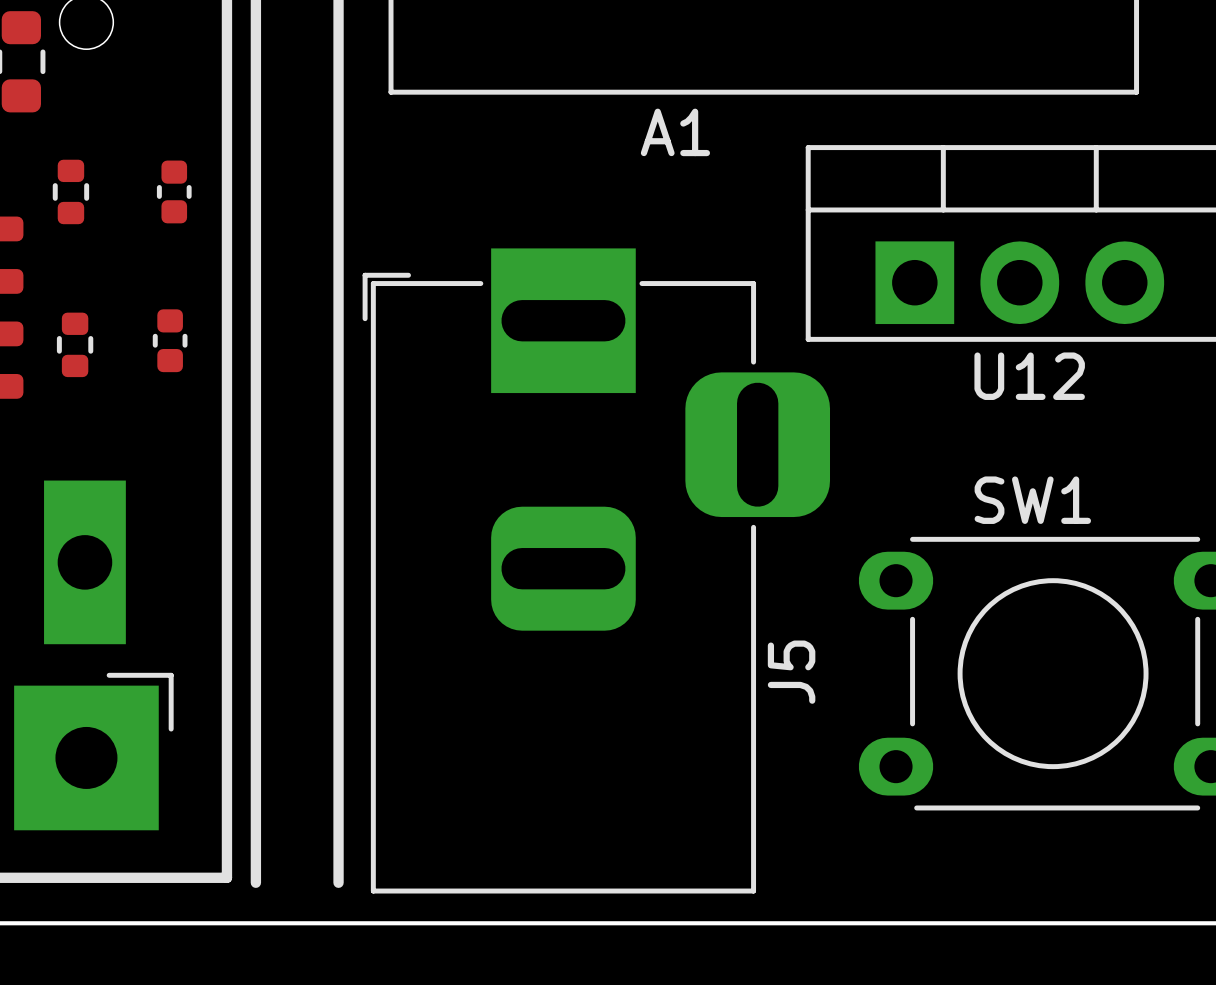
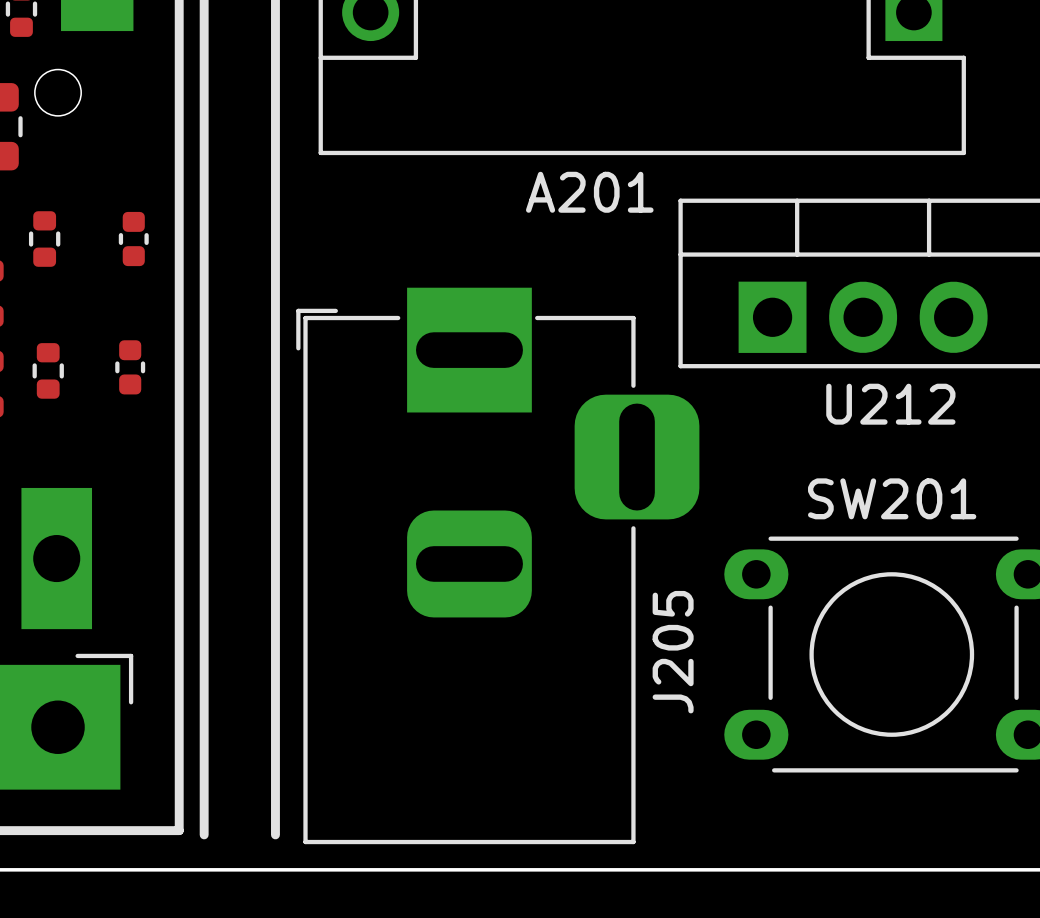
A201 text: A1 (675, 132) -> none
A201 name: none -> A201 (589, 192)
U212 text: U12 (1029, 376) -> none
U212 name: none -> U212 (890, 404)
SW201 name: none -> SW201 (892, 498)
SW201 text: SW1 (1032, 500) -> none
J205 name: none -> J205 (673, 652)
J205 text: J5 (791, 672) -> none

